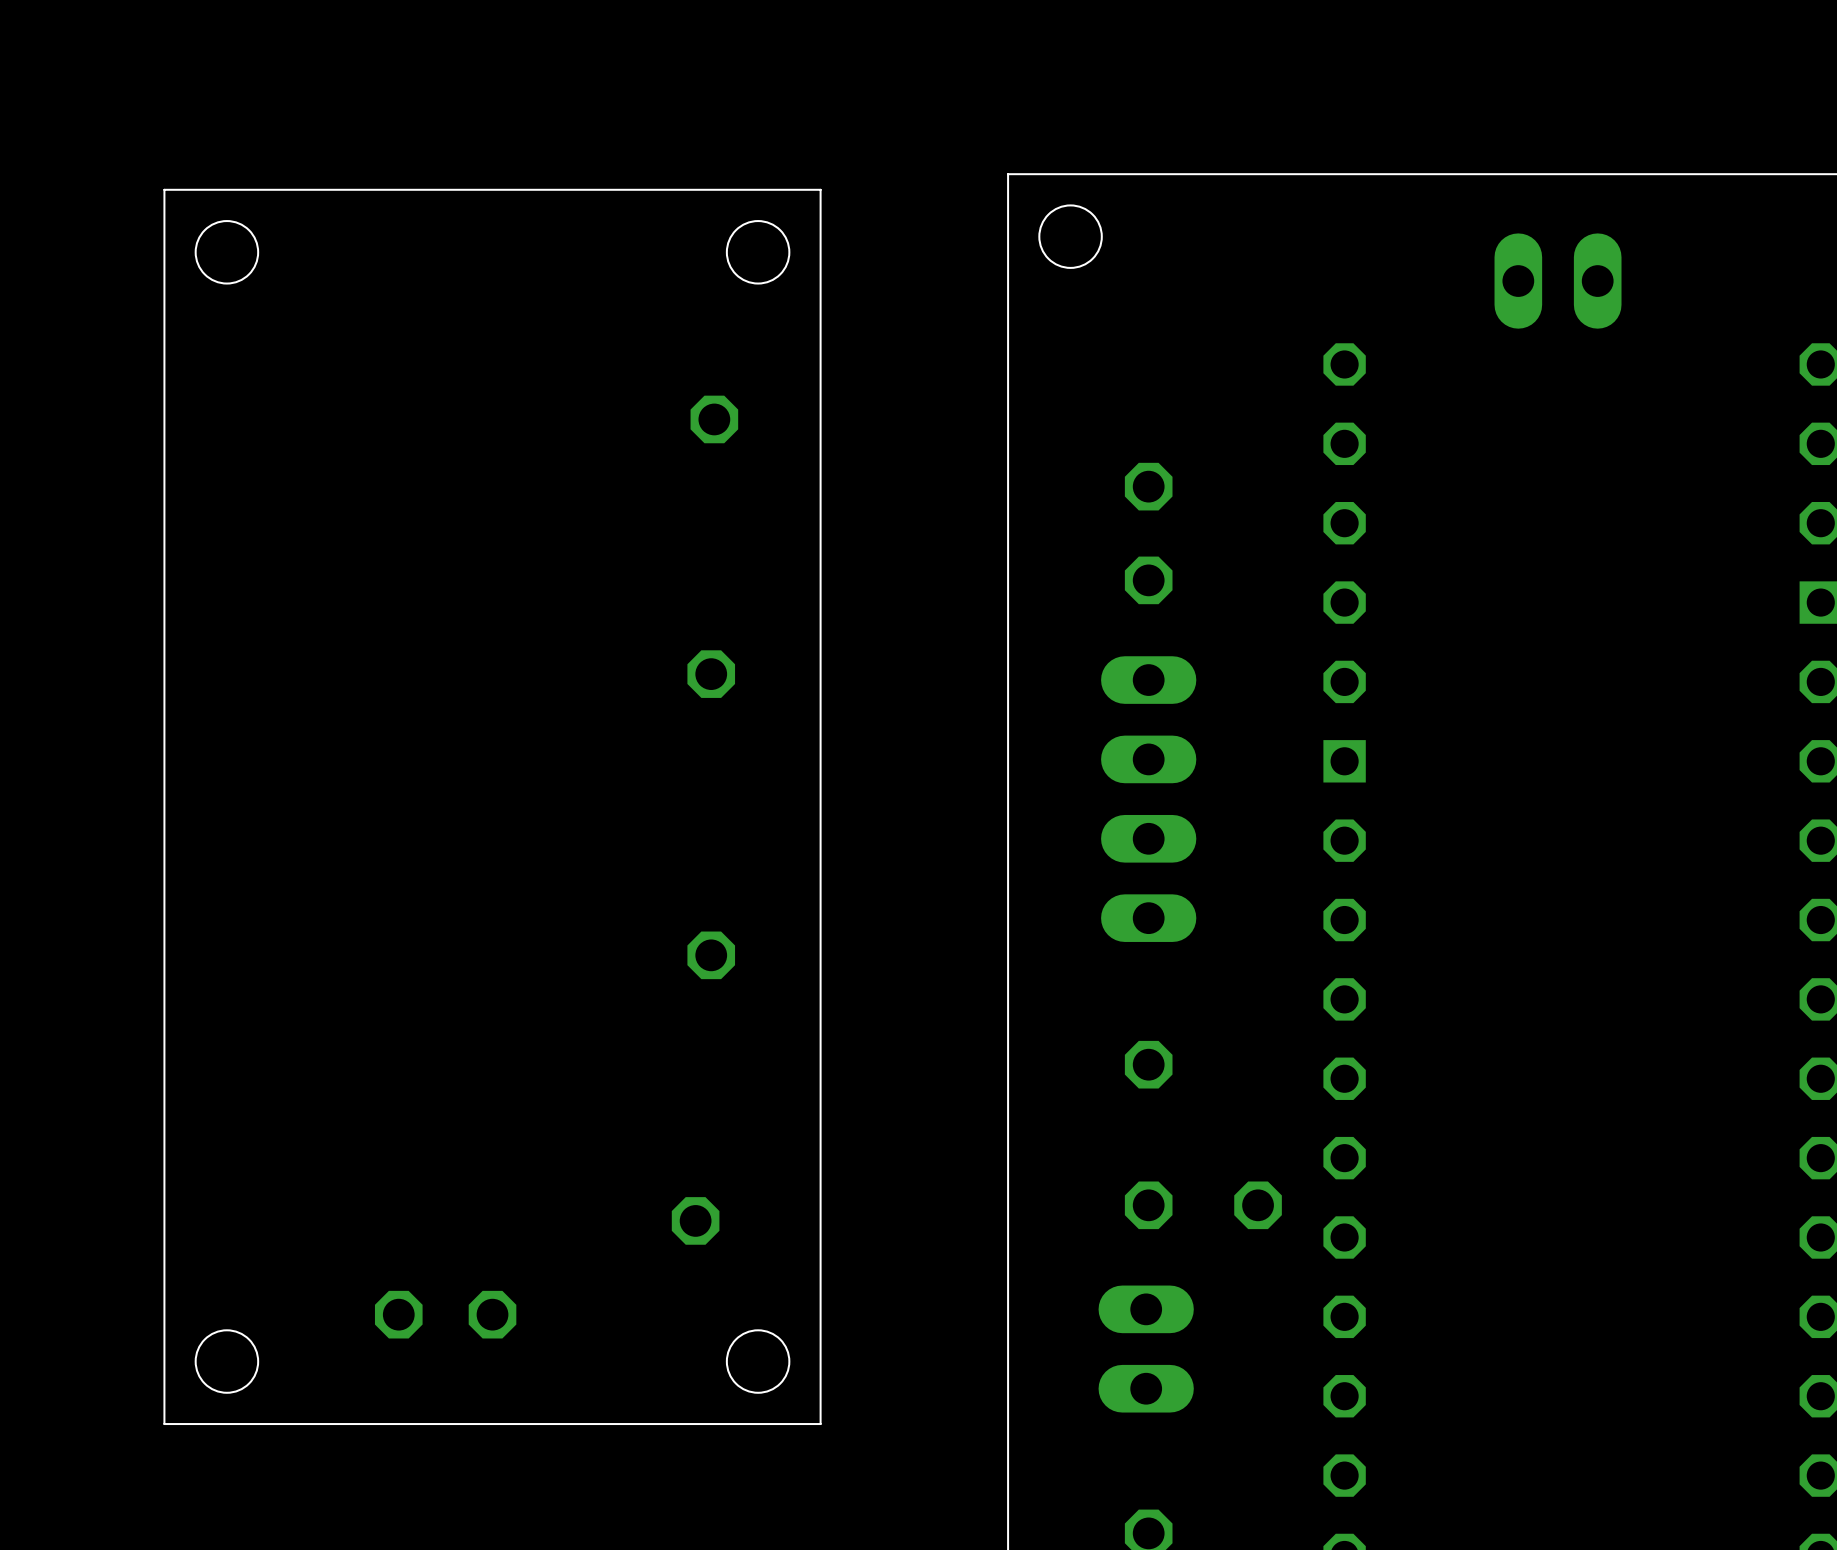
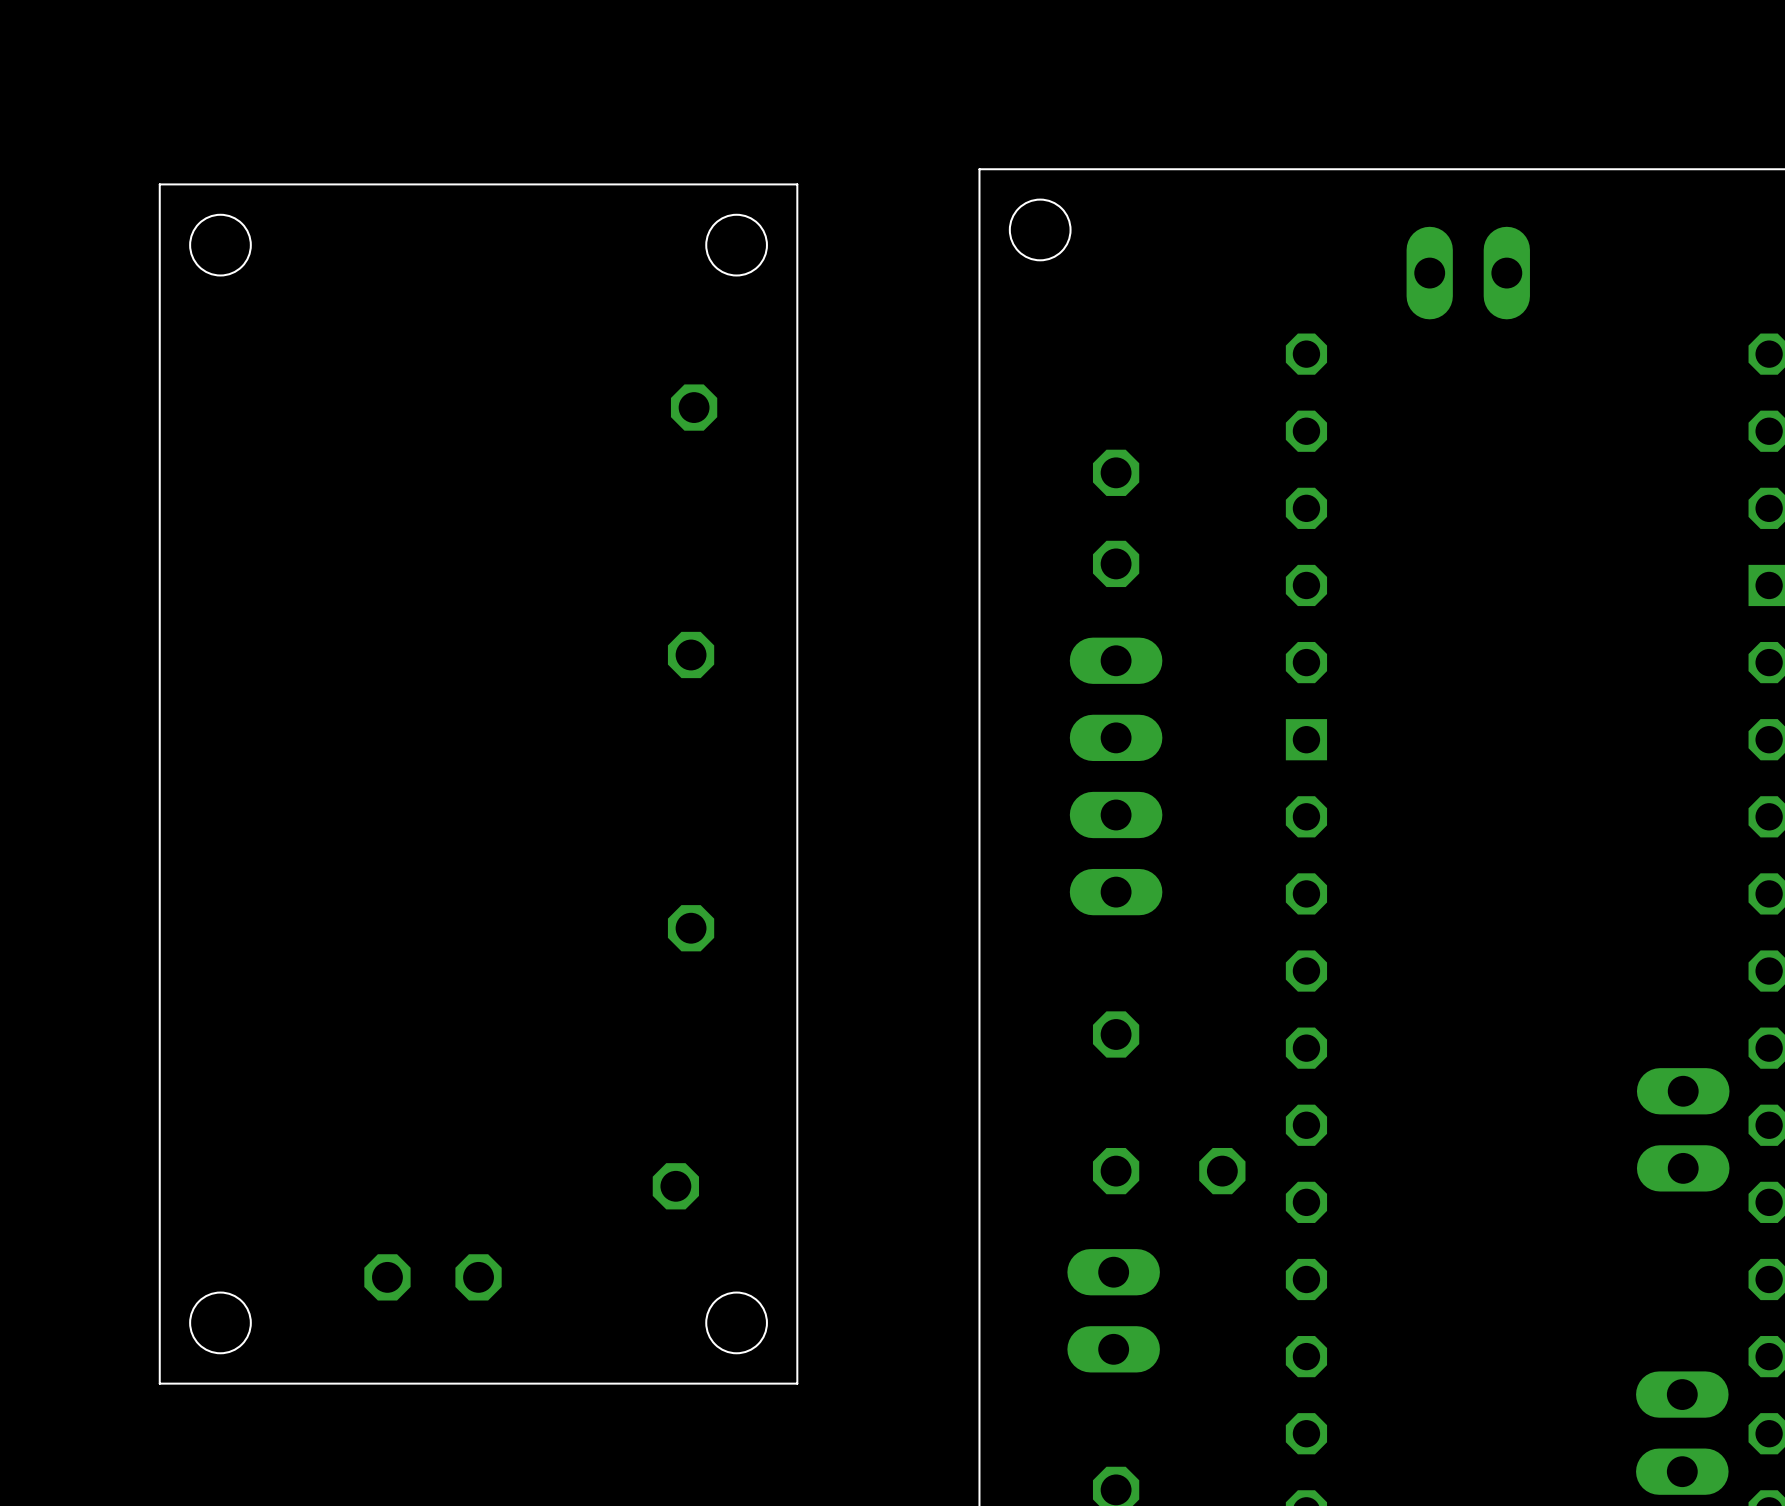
part position: (1558, 281) -> (1468, 273)
part: none -> (1683, 1129)
part: none -> (1682, 1433)

